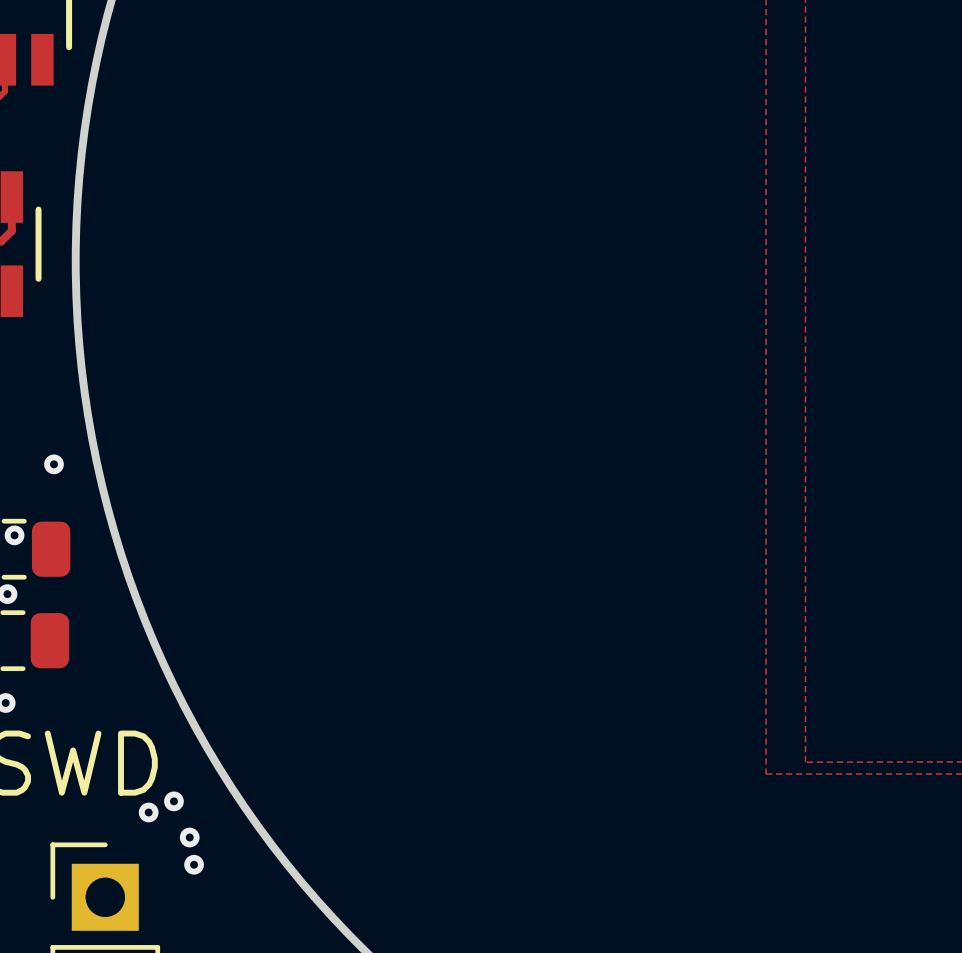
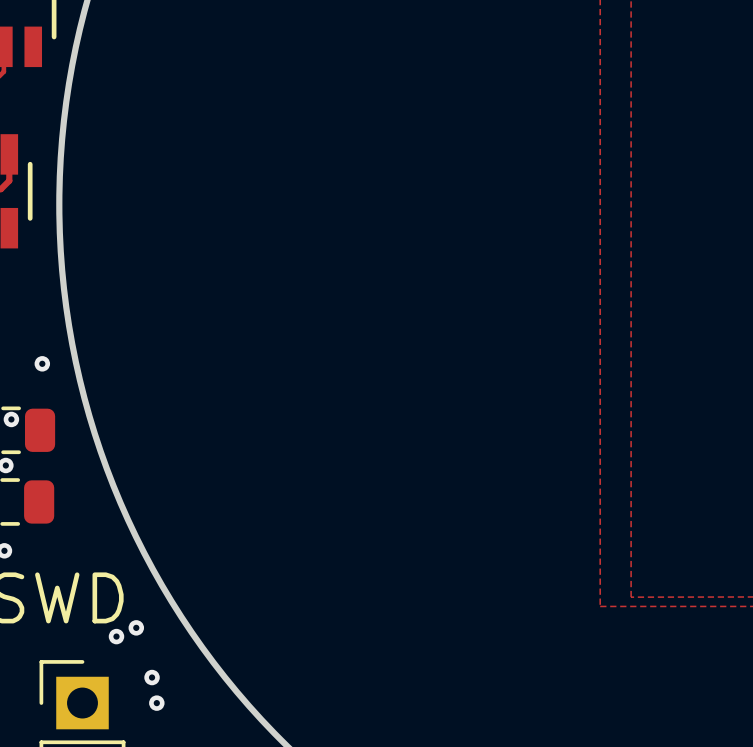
via position: (189, 837) -> (156, 703)

